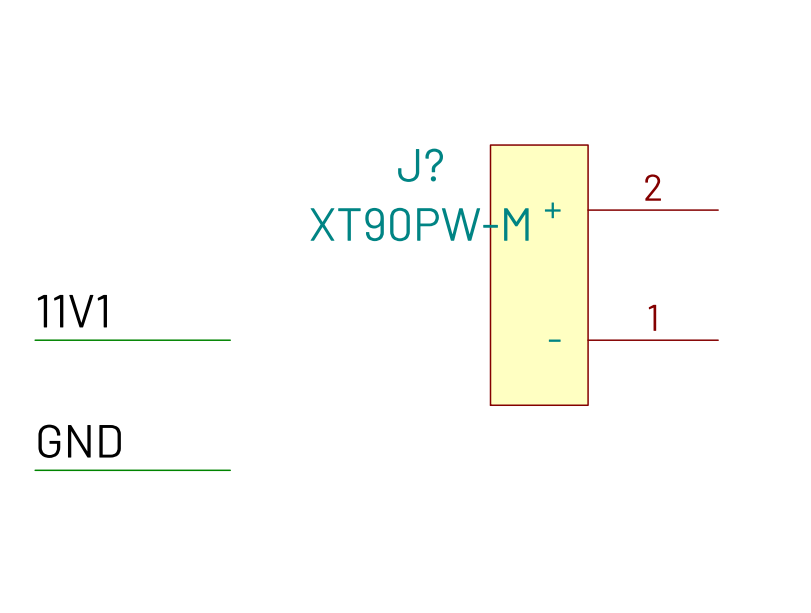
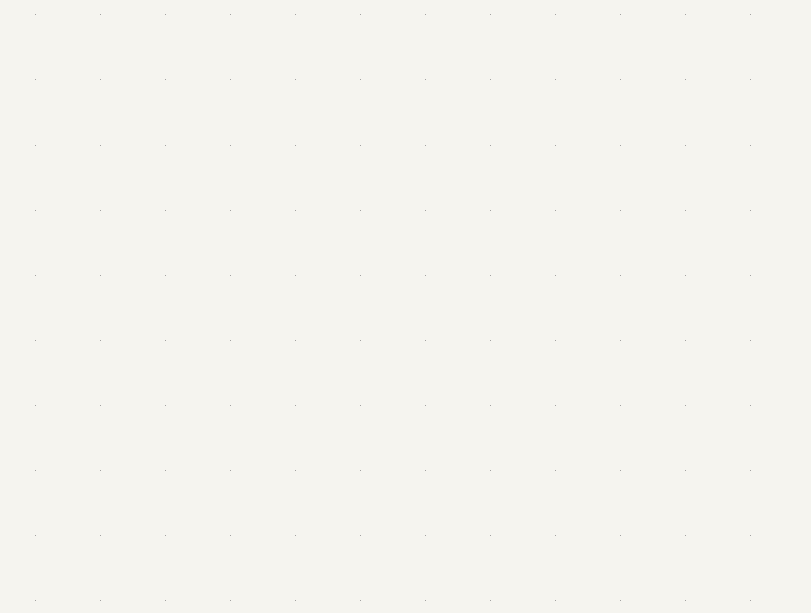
J?: XT90PW-M (604, 275) -> none
label: 11V1 (72, 311) -> none
wire: (35, 340) (230, 340) -> none
label: GND (79, 441) -> none
wire: (35, 470) (230, 470) -> none

